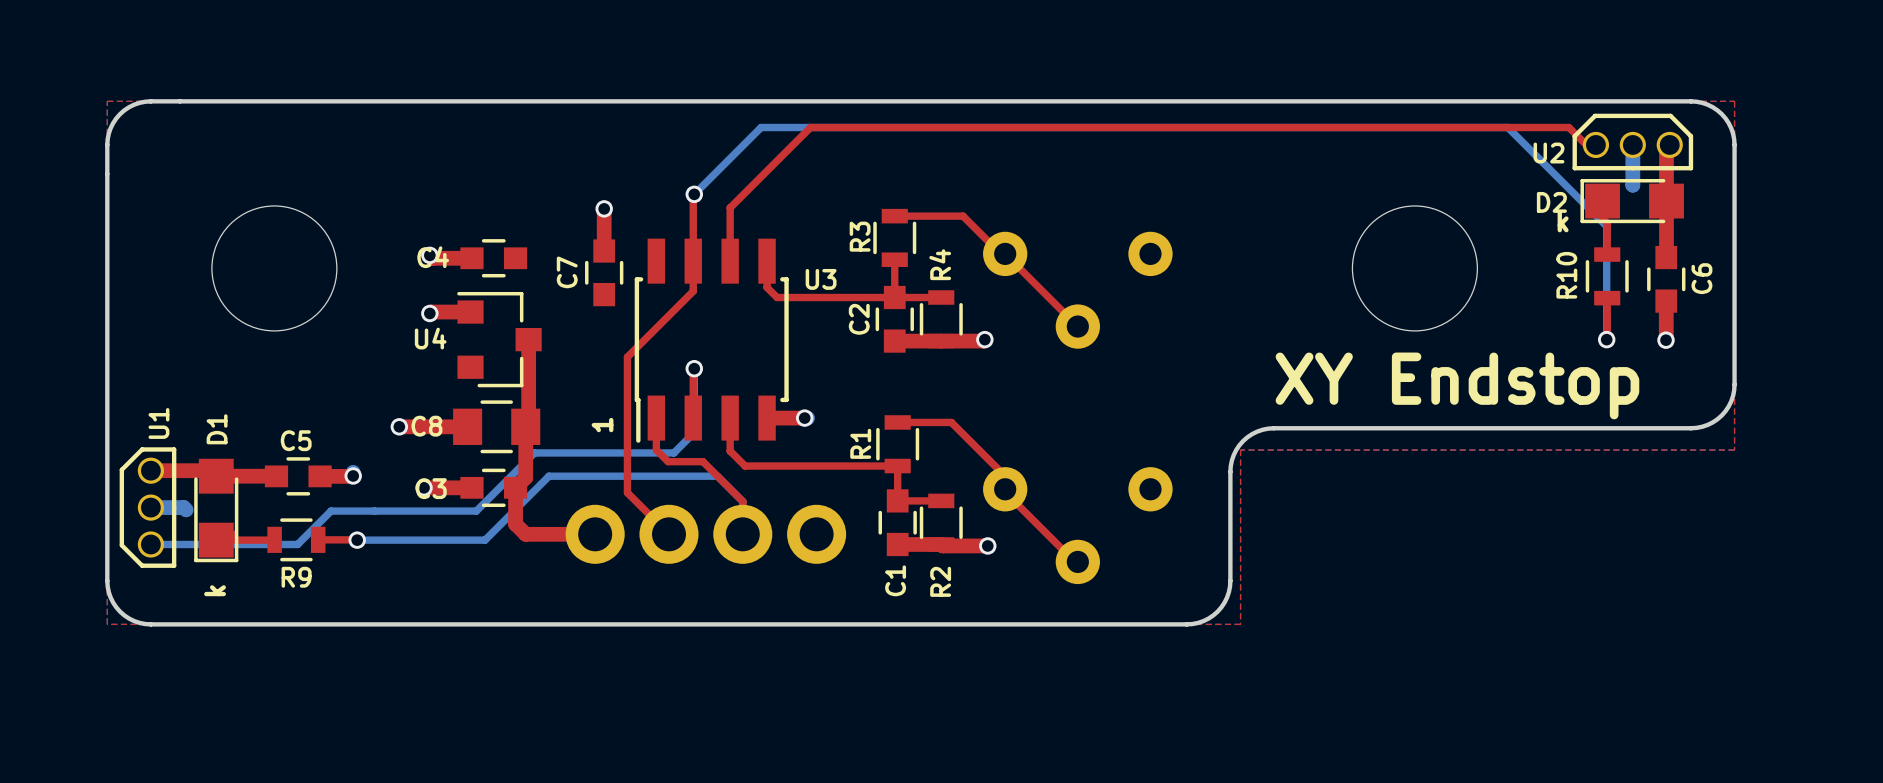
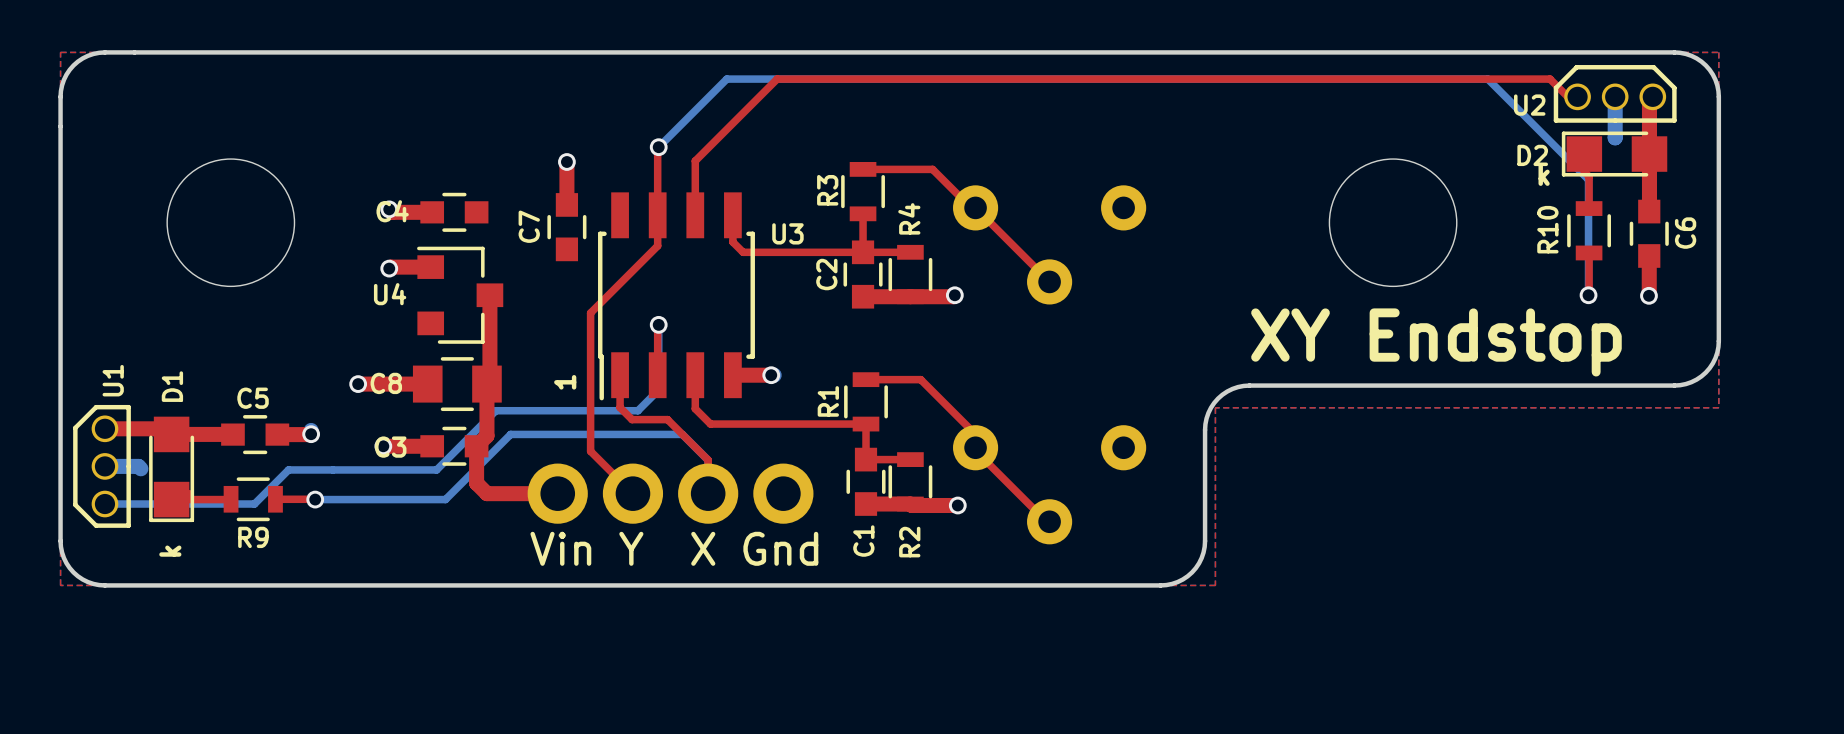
text: none -> Vin Y X Gnd (674, 548)

